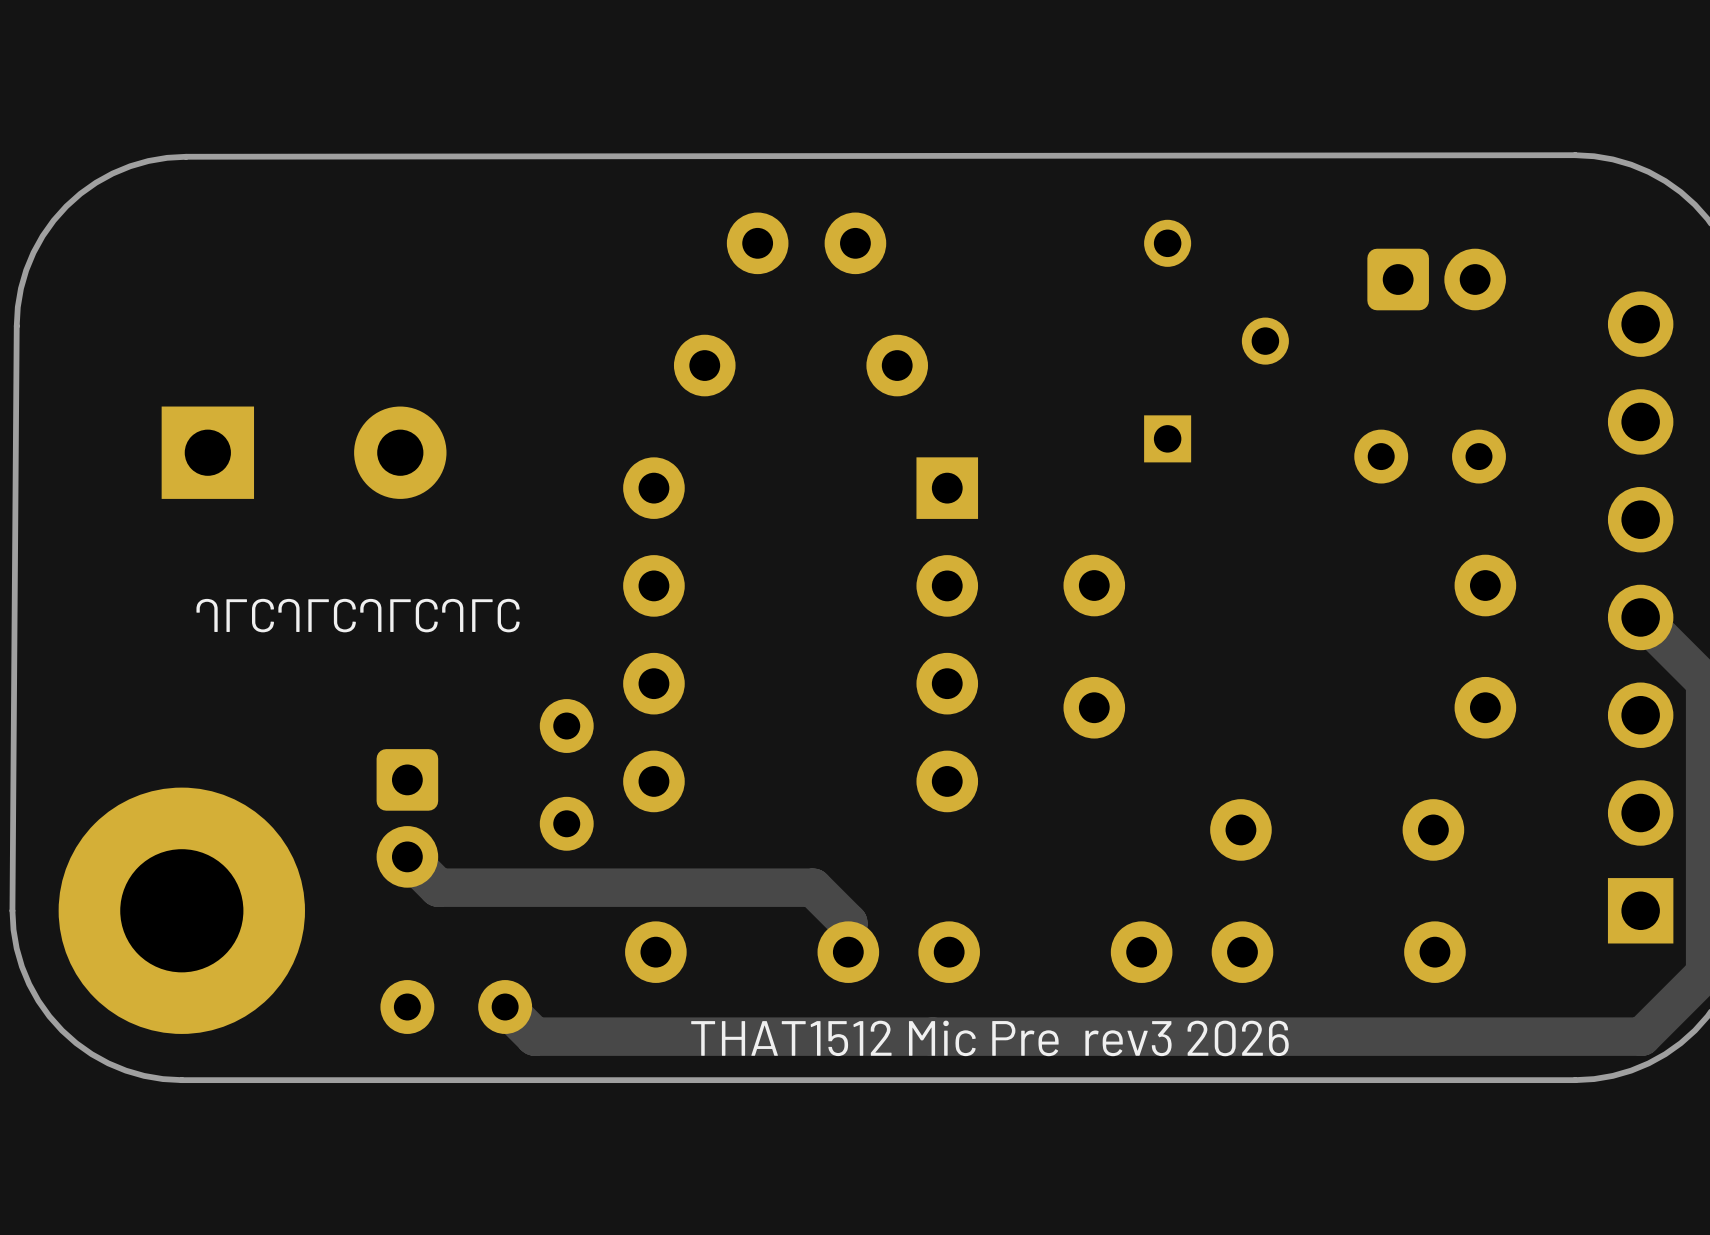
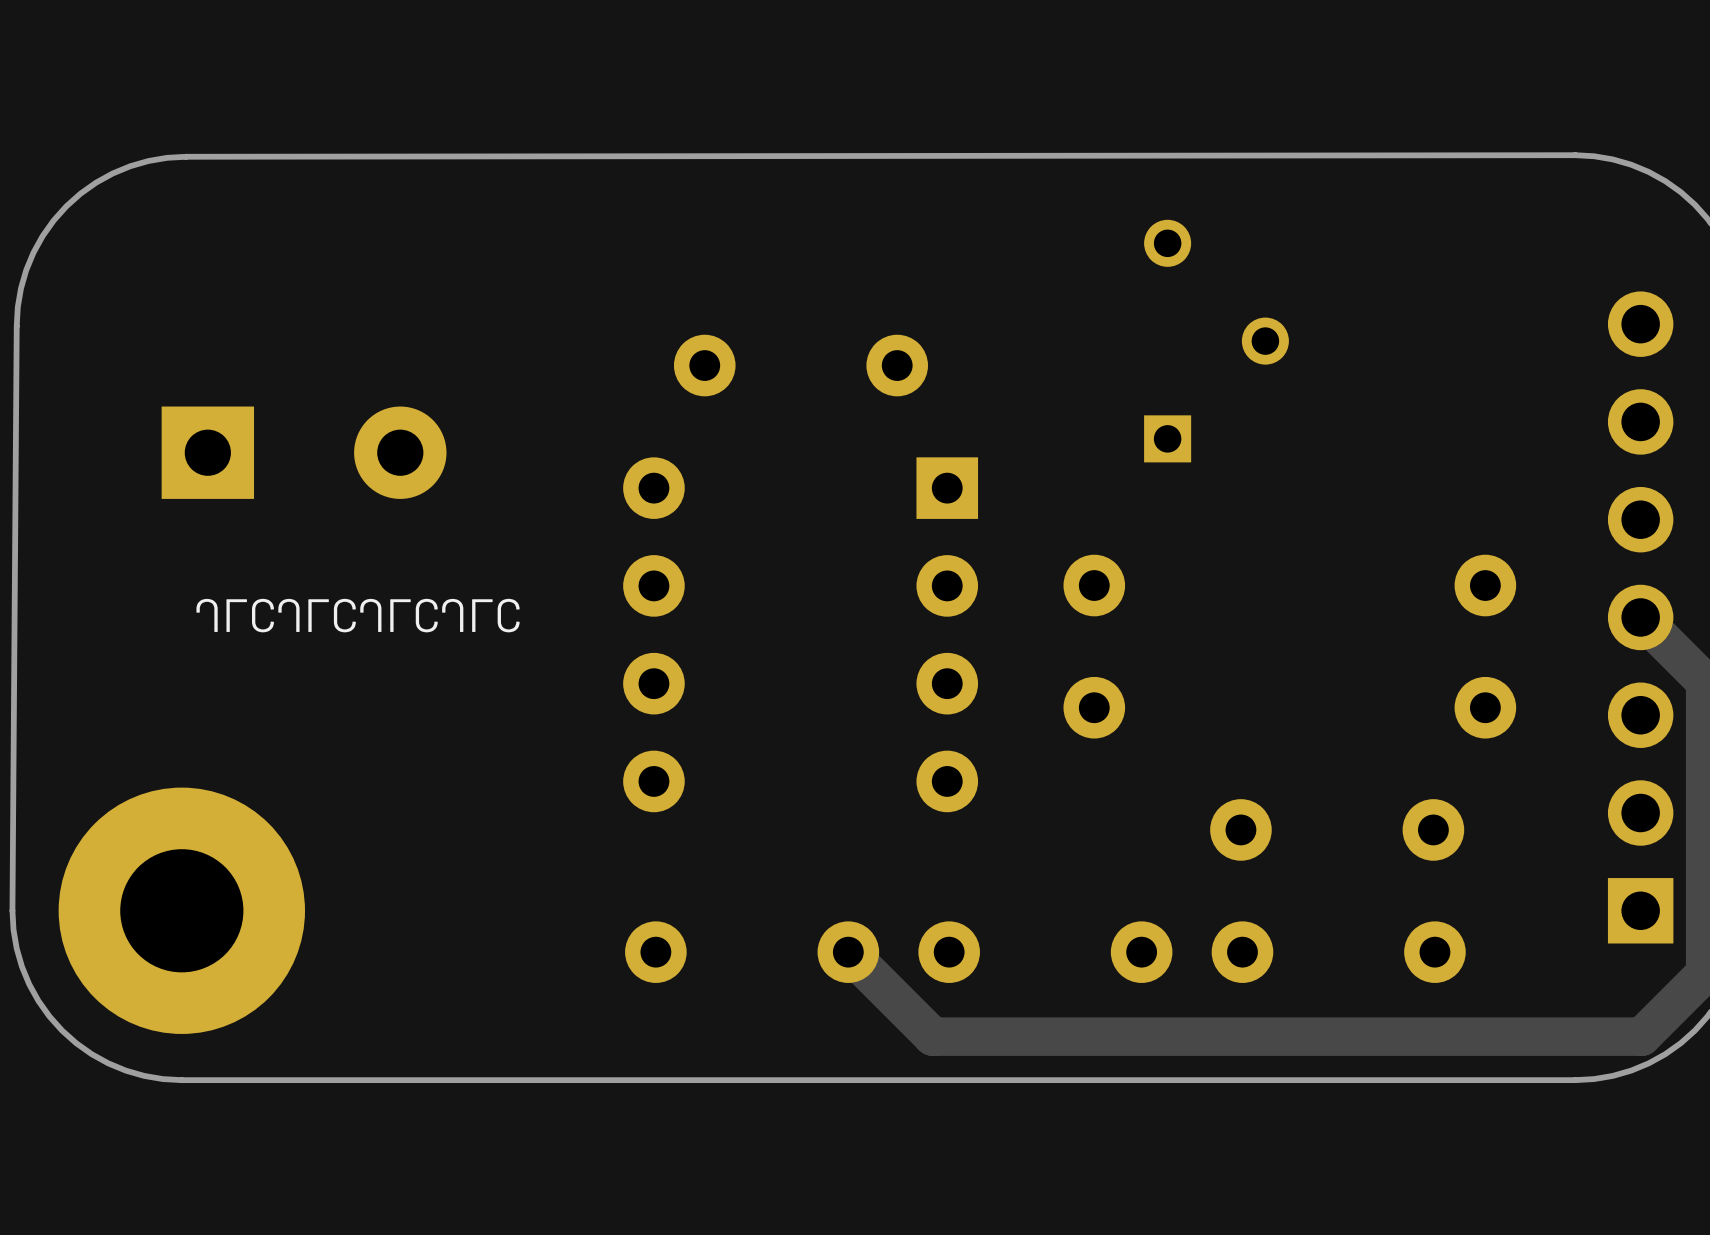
part: (806, 243) -> none
part: (1436, 279) -> none
part: (1430, 456) -> none
part: (566, 774) -> none
part: (407, 818) -> none
track: (407, 856) (438, 887) (813, 887) (848, 922) (848, 952) -> none
part: (456, 1007) -> none
track: (505, 1007) (534, 1036) (932, 1036) -> (848, 952) (932, 1036)
text: THAT1512 Mic Pre rev3 2026 (989, 1038) -> none

